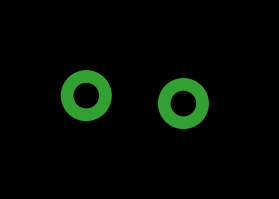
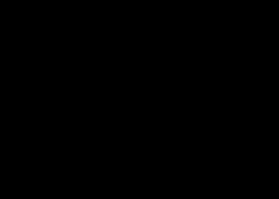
part: (86, 95) -> none
part: (183, 103) -> none

